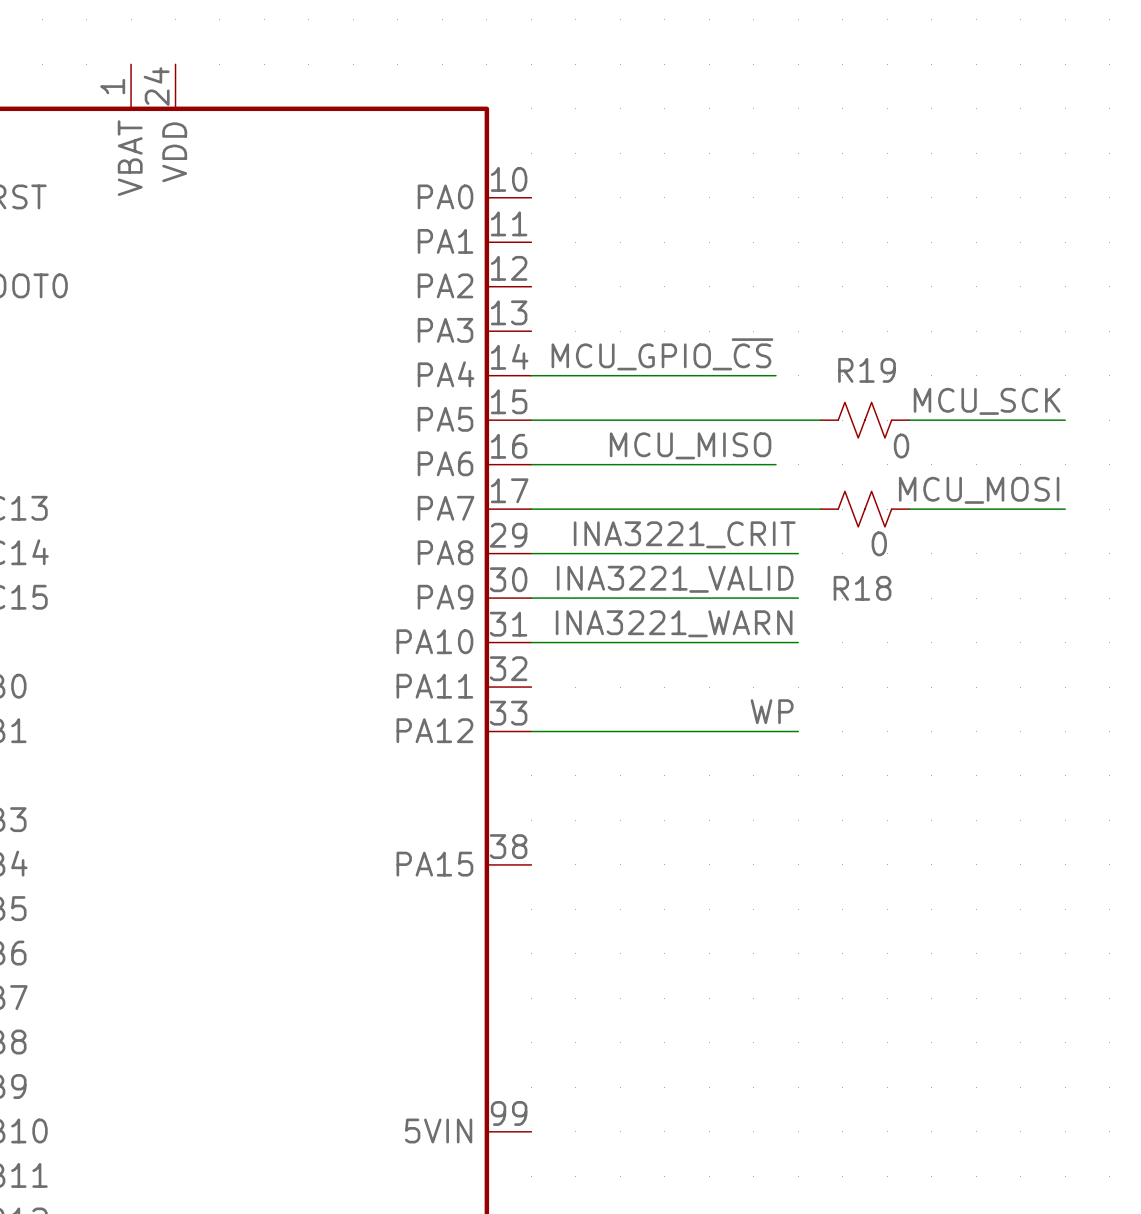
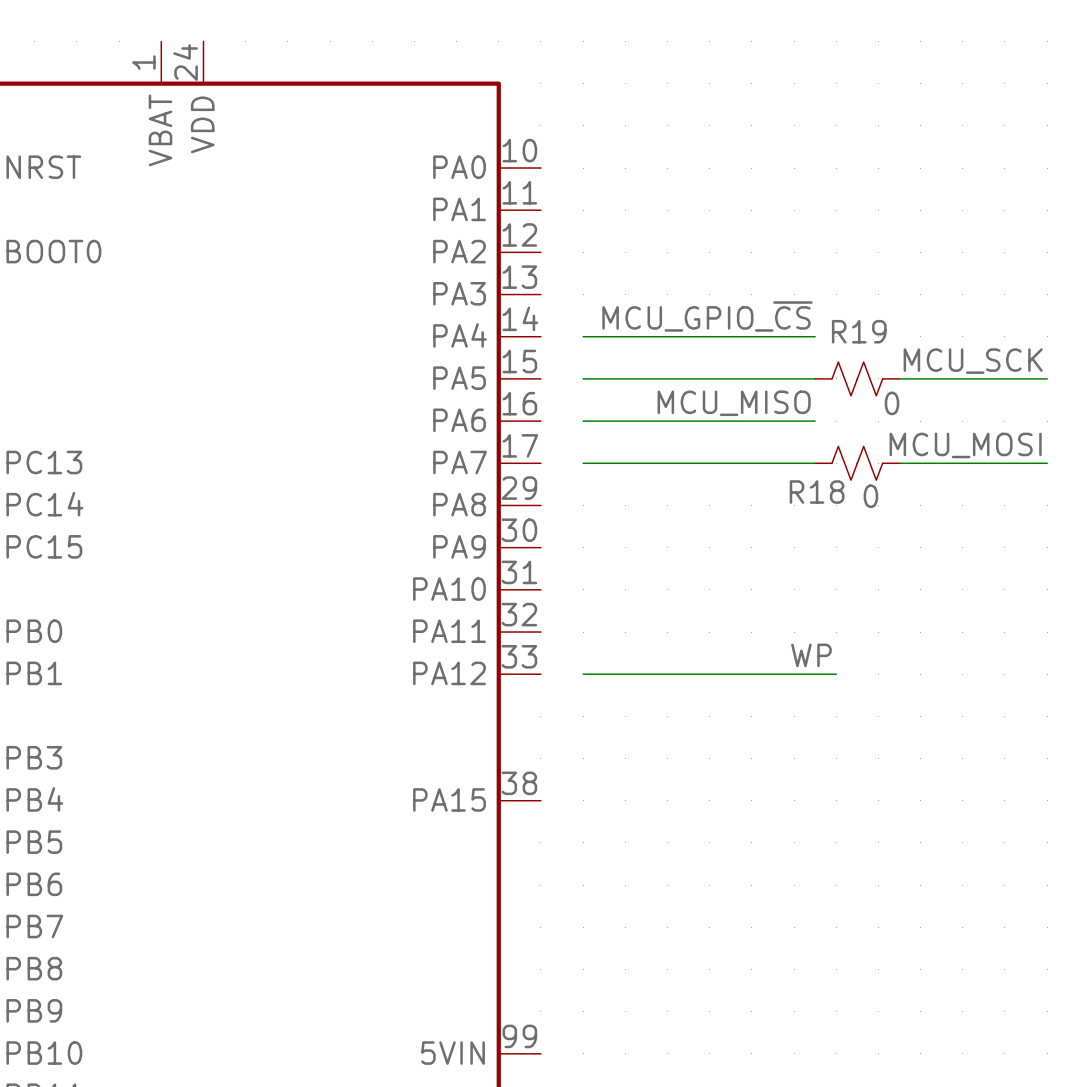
label position: MCU_GPIO_~{CS} (662, 354) -> MCU_GPIO_~{CS} (707, 316)
wire: (531, 375) (575, 375) -> (772, 336) (815, 336)
wire: (531, 420) (575, 420) -> none
label position: MCU_MISO (690, 445) -> MCU_MISO (734, 403)
wire: (531, 464) (575, 464) -> (772, 421) (815, 421)
wire: (531, 509) (575, 509) -> none
label: INA3221_CRIT (684, 534) -> none
wire: (531, 553) (798, 553) -> none
label: INA3221_VALID (675, 579) -> none
R18 name position: R18 (862, 588) -> R18 (817, 492)
wire: (531, 598) (798, 598) -> none
label: INA3221_WARN (674, 623) -> none
wire: (531, 642) (798, 642) -> none
label position: WP (772, 711) -> WP (811, 655)
wire: (531, 731) (575, 731) -> (794, 674) (836, 674)

